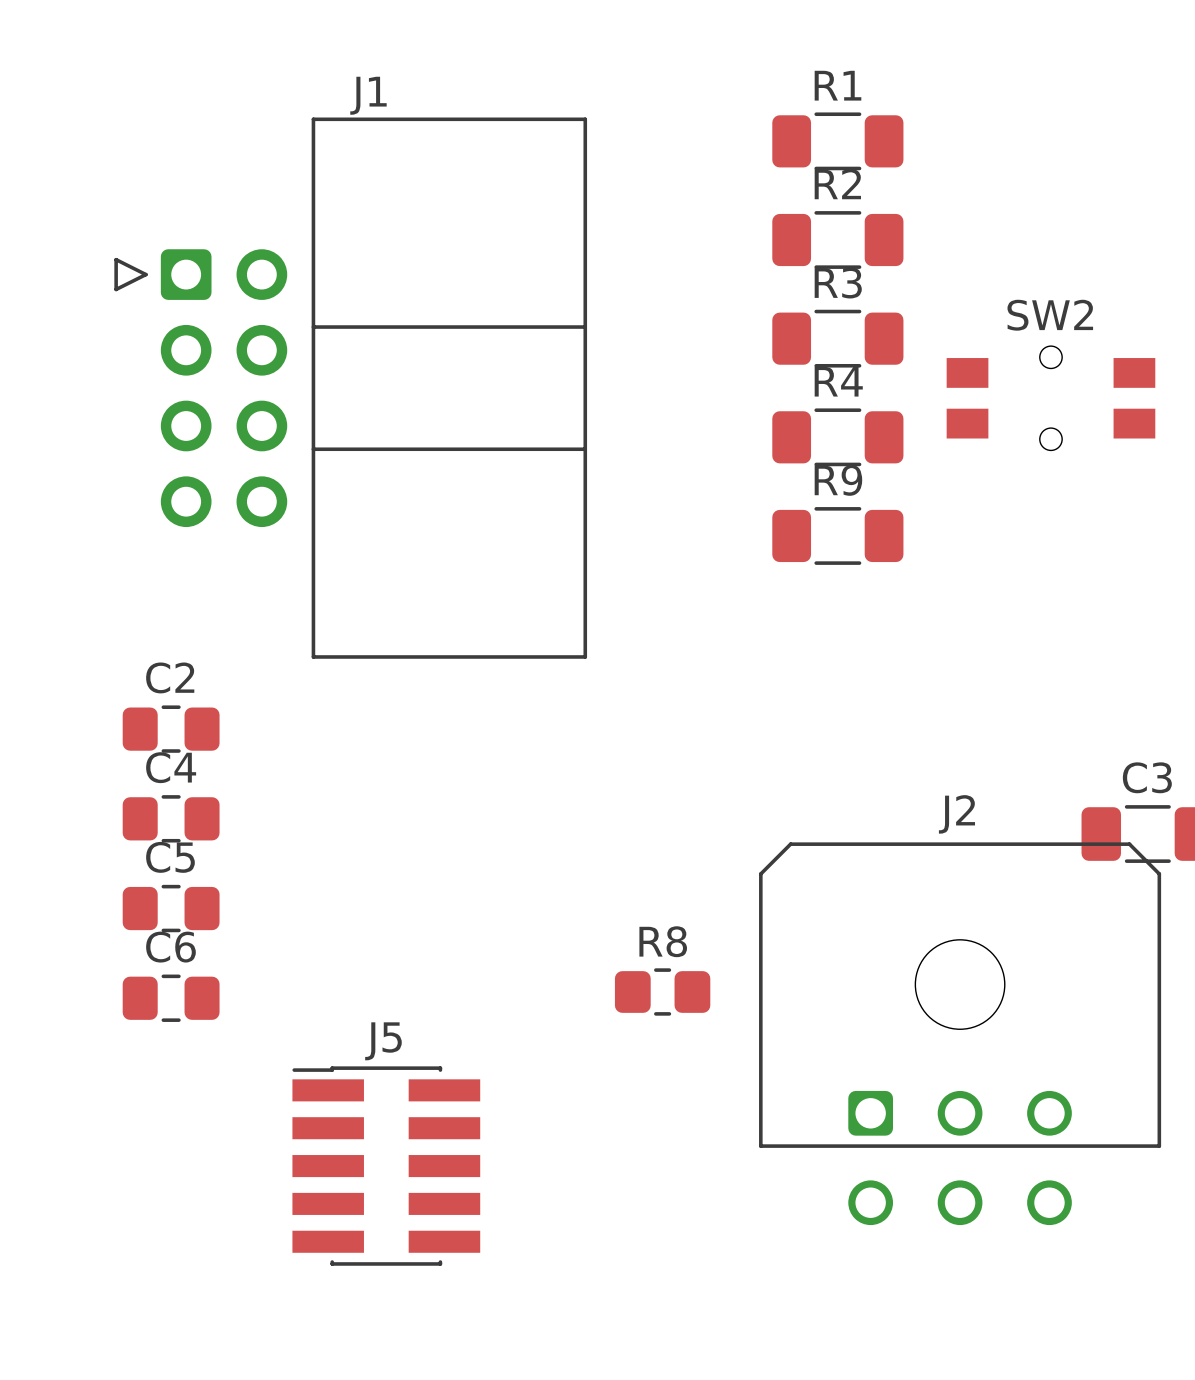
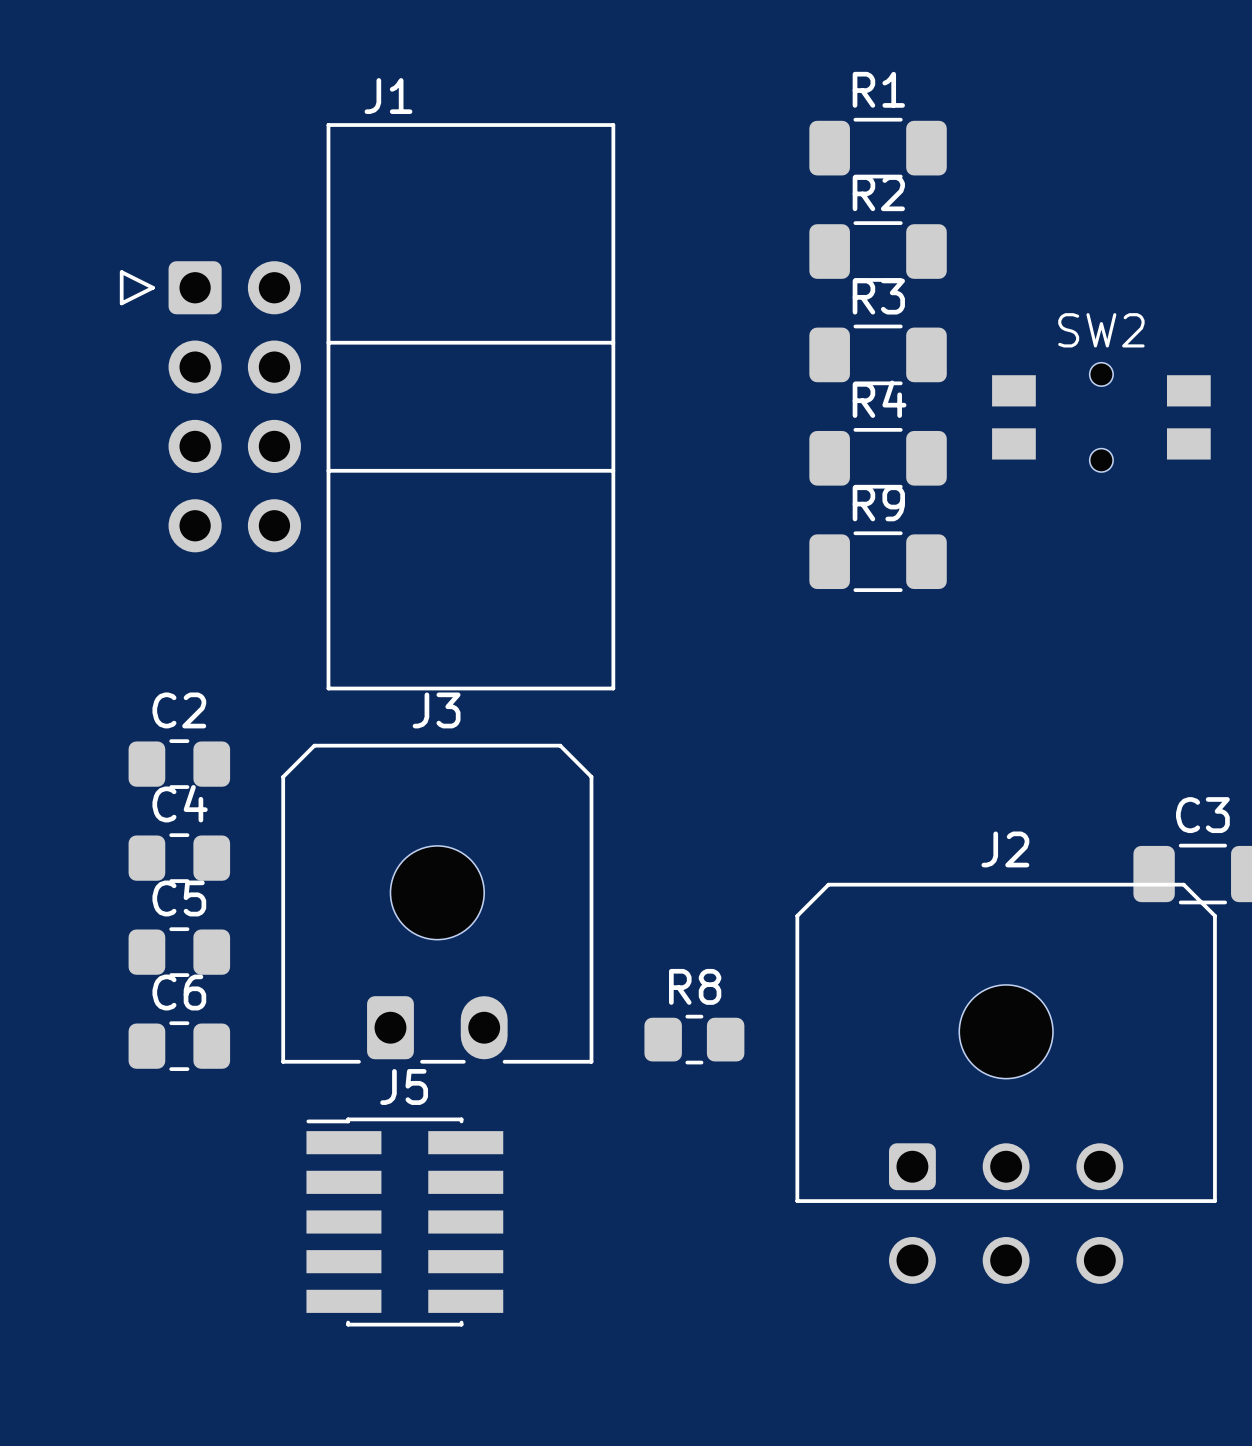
J3: none -> (437, 903)

